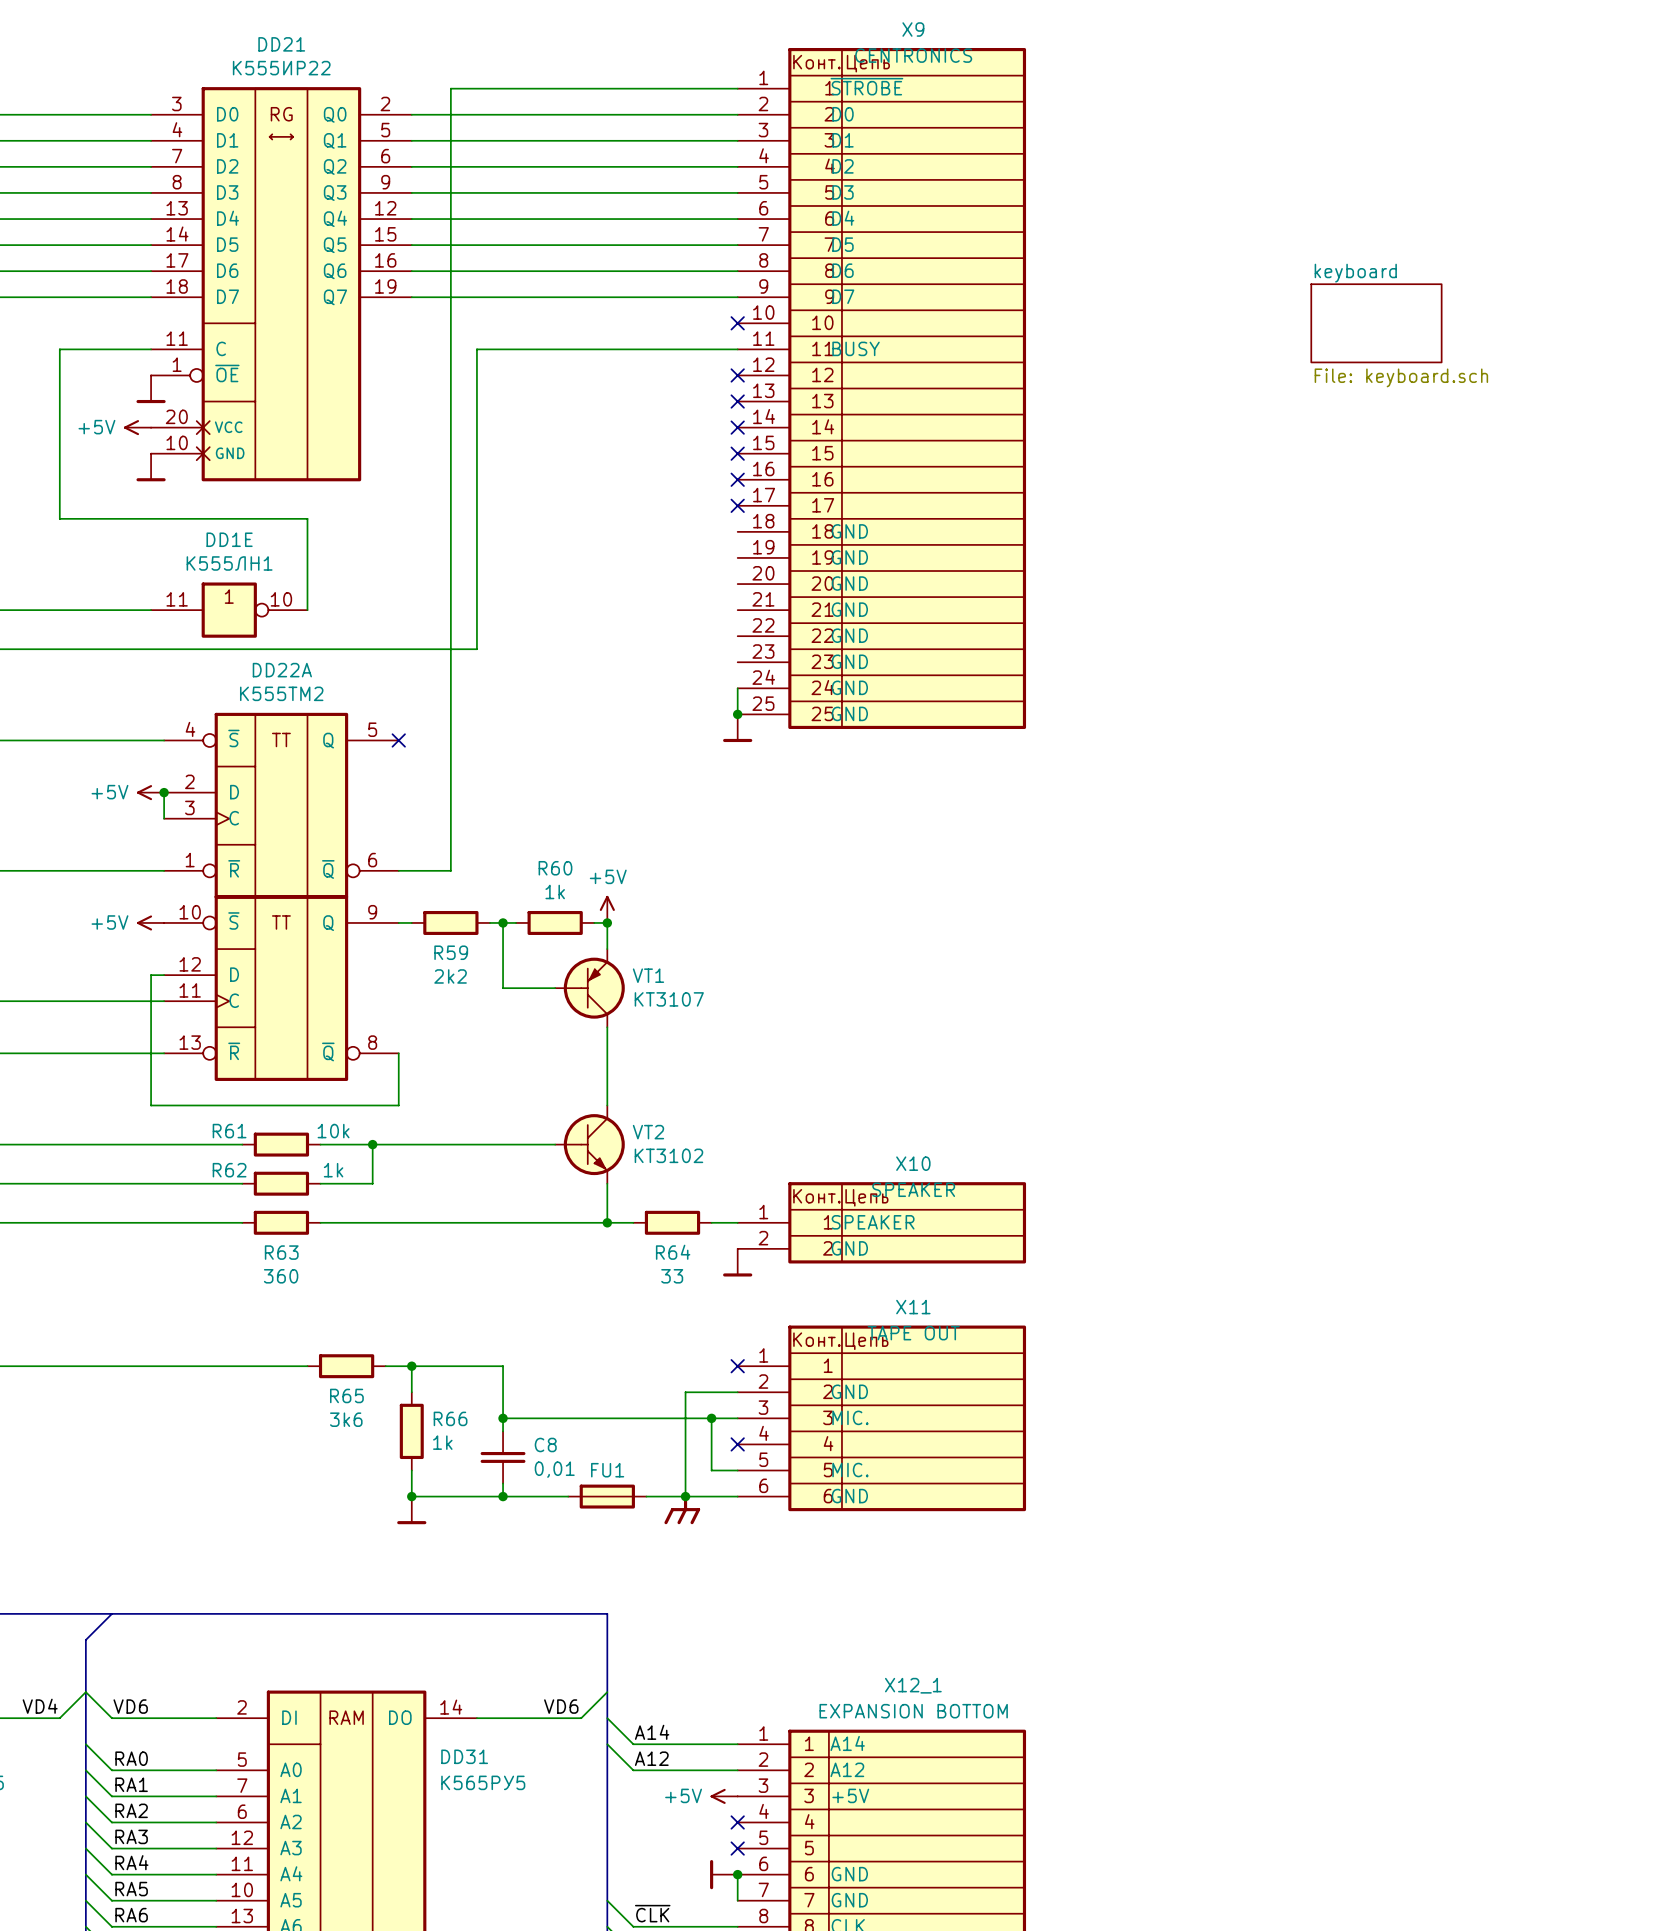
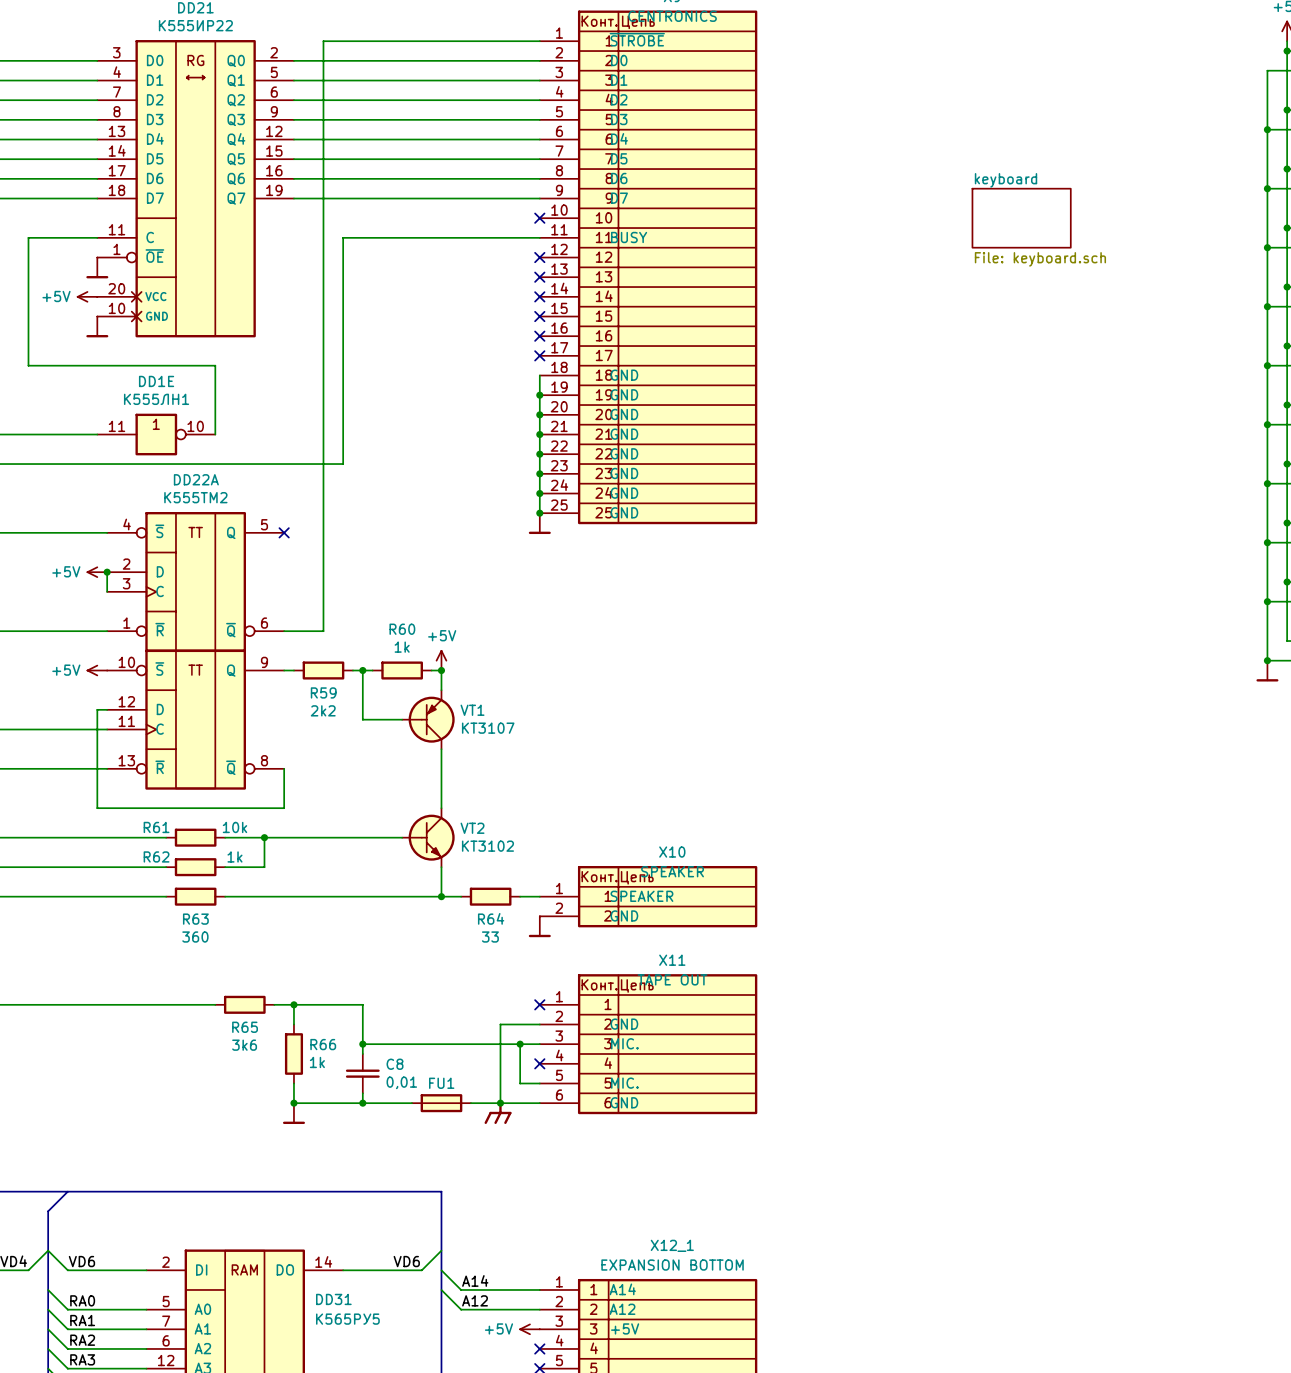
wire: none -> (539, 375) (539, 493)
junction: none -> (539, 395)
junction: none -> (539, 414)
junction: none -> (539, 434)
junction: none -> (539, 454)
junction: none -> (539, 473)
junction: none -> (539, 493)

